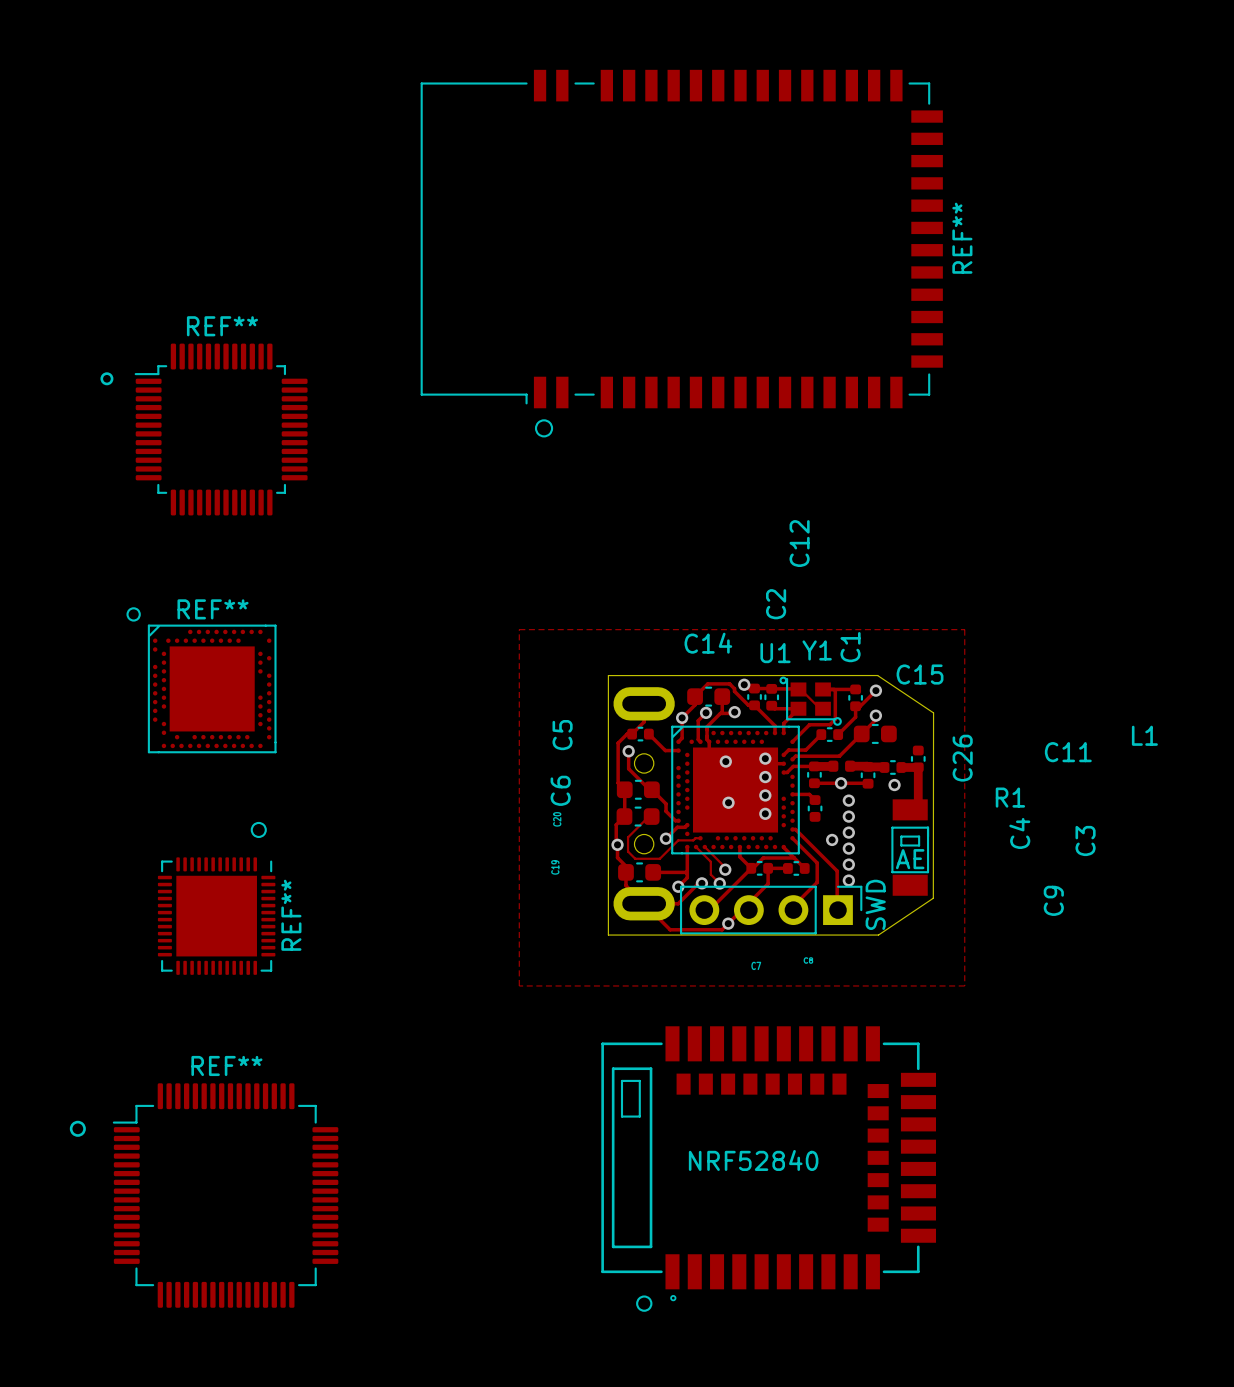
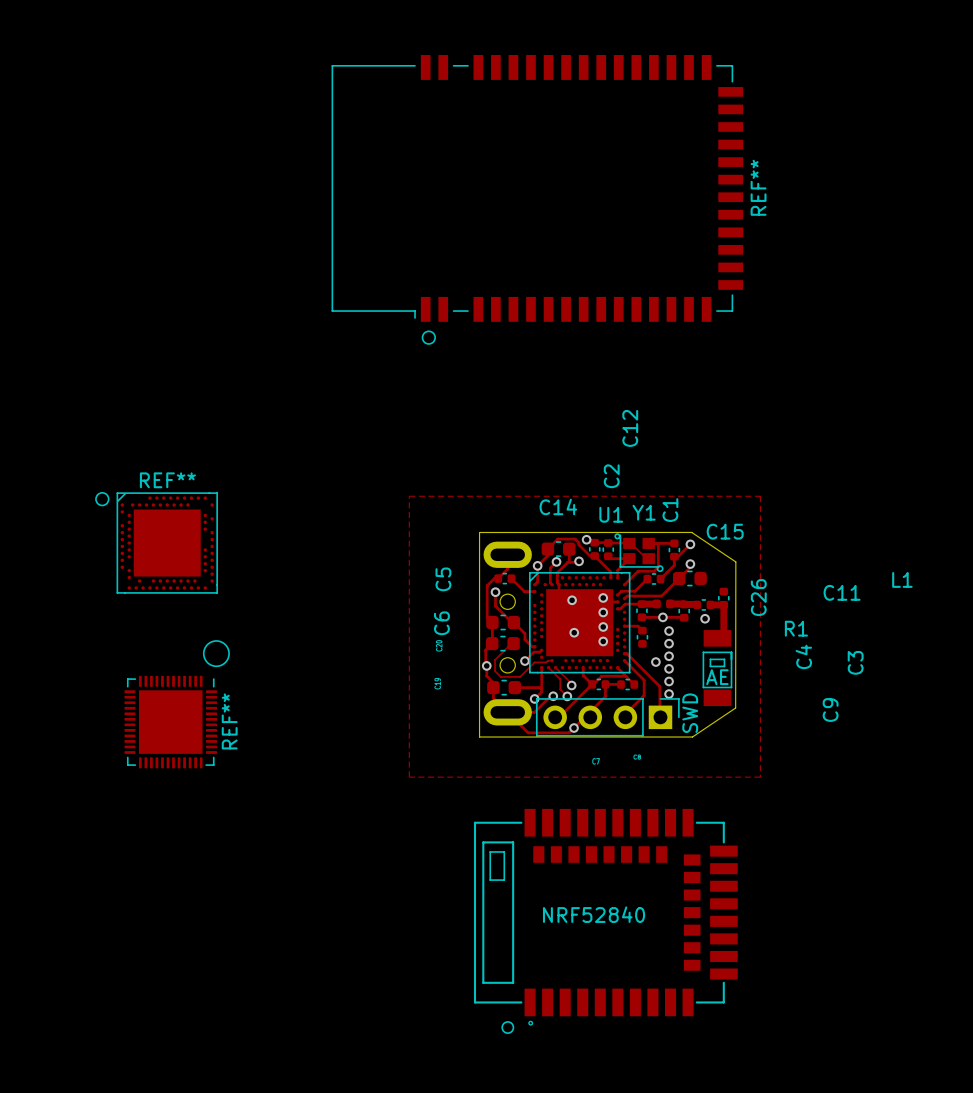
drawing: [100, 372, 114, 386] -> none
REF**: (221, 429) -> none
drawing: [126, 607, 141, 622] -> none
drawing: none -> [95, 491, 110, 507]
drawing shape: [250, 821, 267, 839] -> [202, 640, 230, 668]
drawing: [69, 1120, 86, 1137] -> none
REF**: (225, 1195) -> none

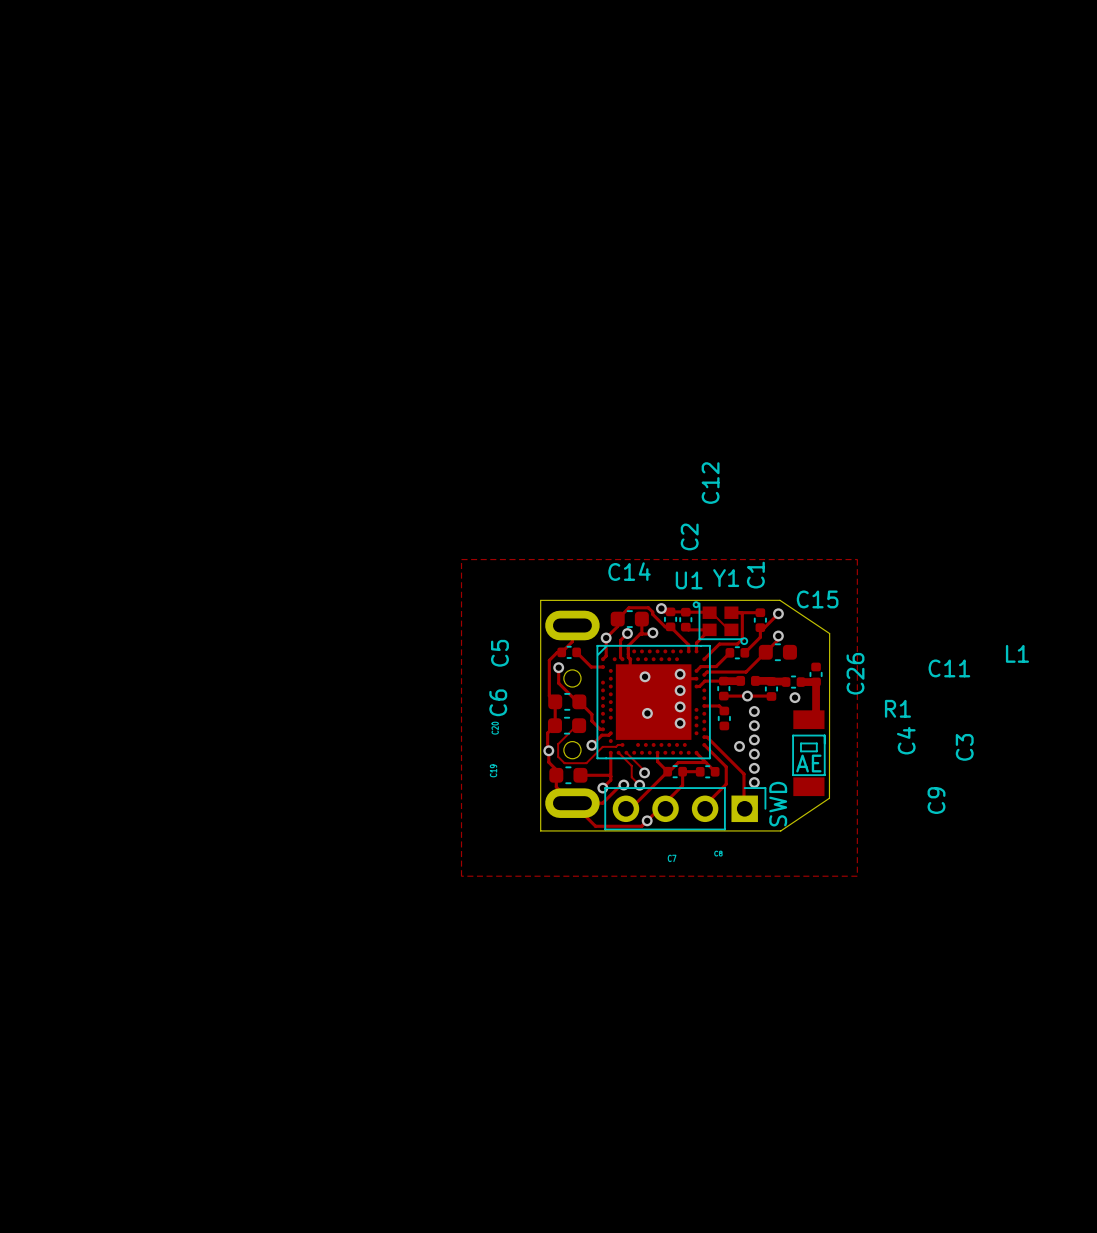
REF**: (537, 188) -> none
drawing: [421, 330, 436, 345] -> none
drawing: [95, 491, 110, 507] -> none
REF**: (167, 543) -> none
drawing: [202, 640, 230, 668] -> none
REF**: (170, 722) -> none
NRF52840: (605, 917) -> none
drawing: [501, 1021, 515, 1034] -> none

